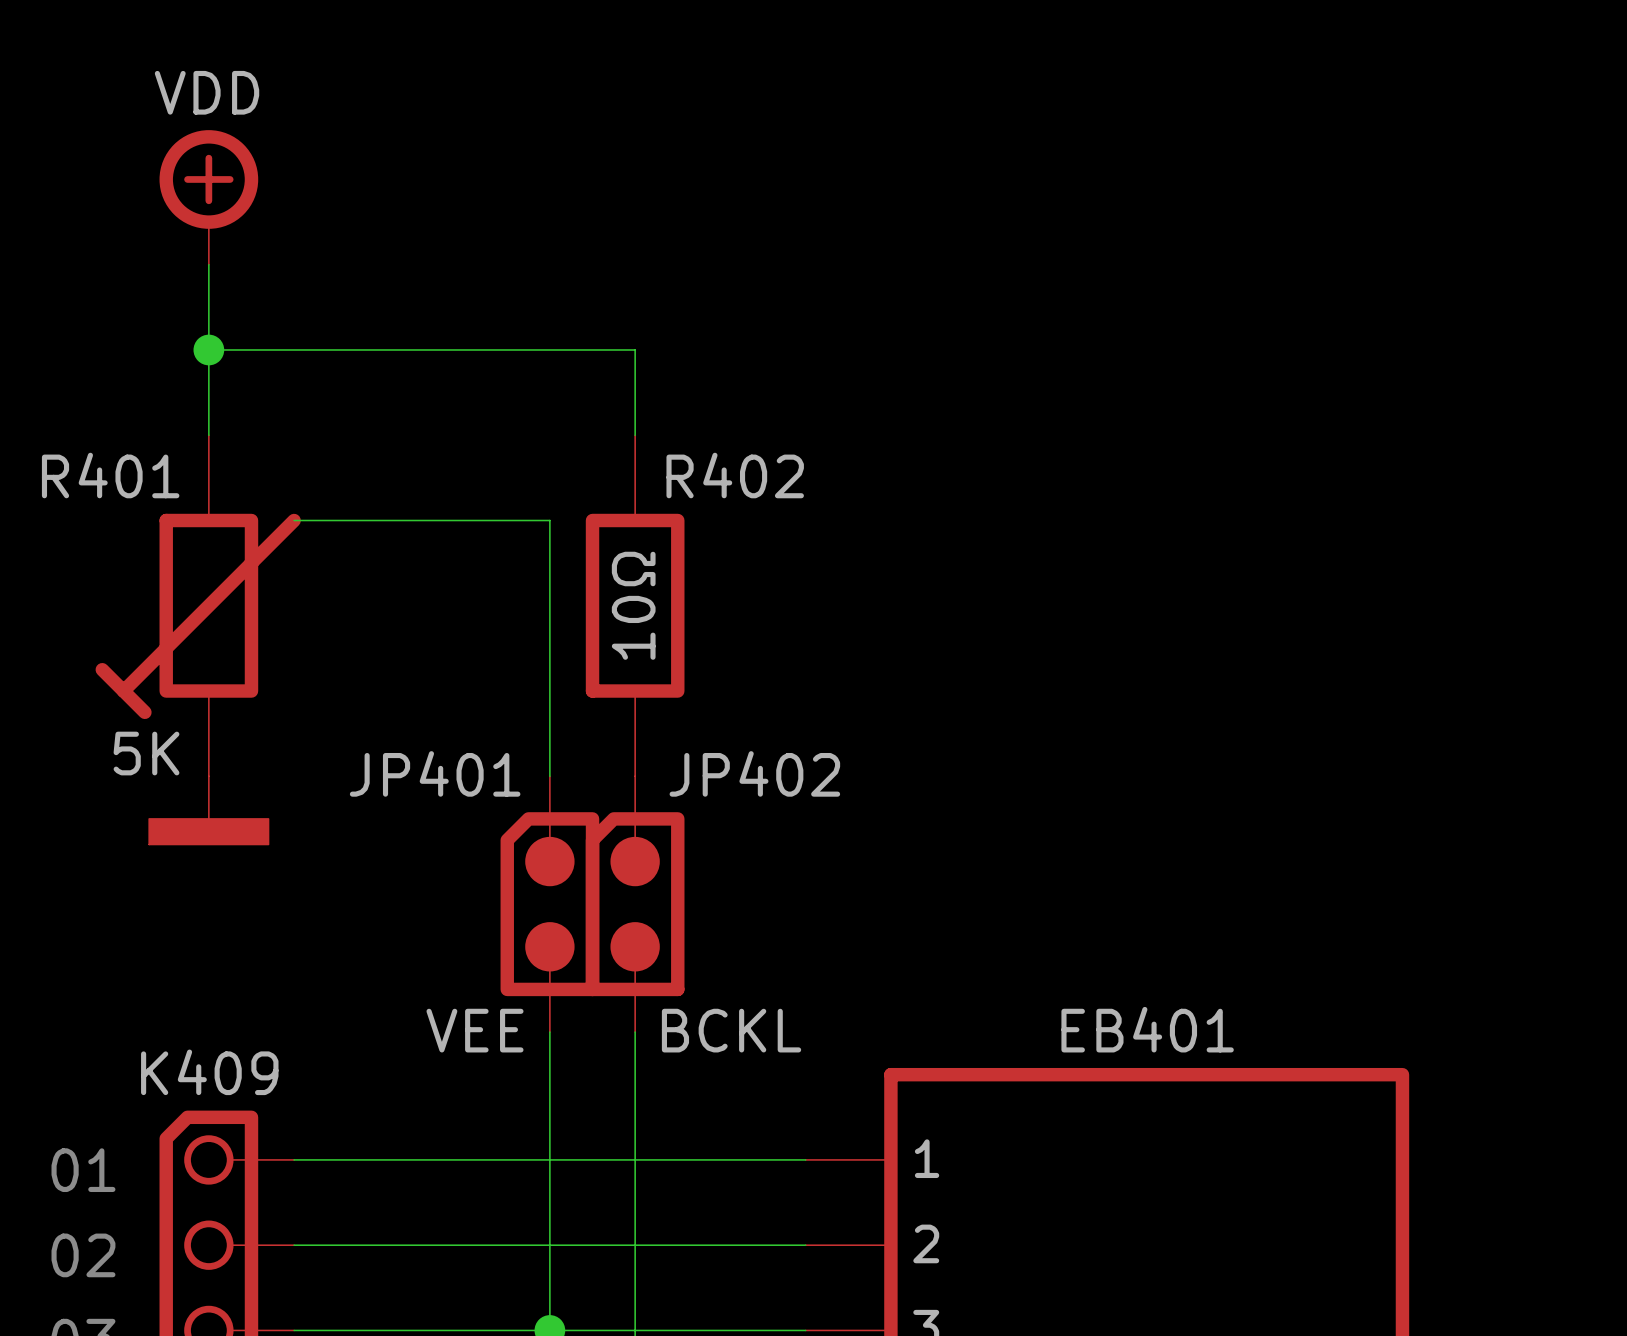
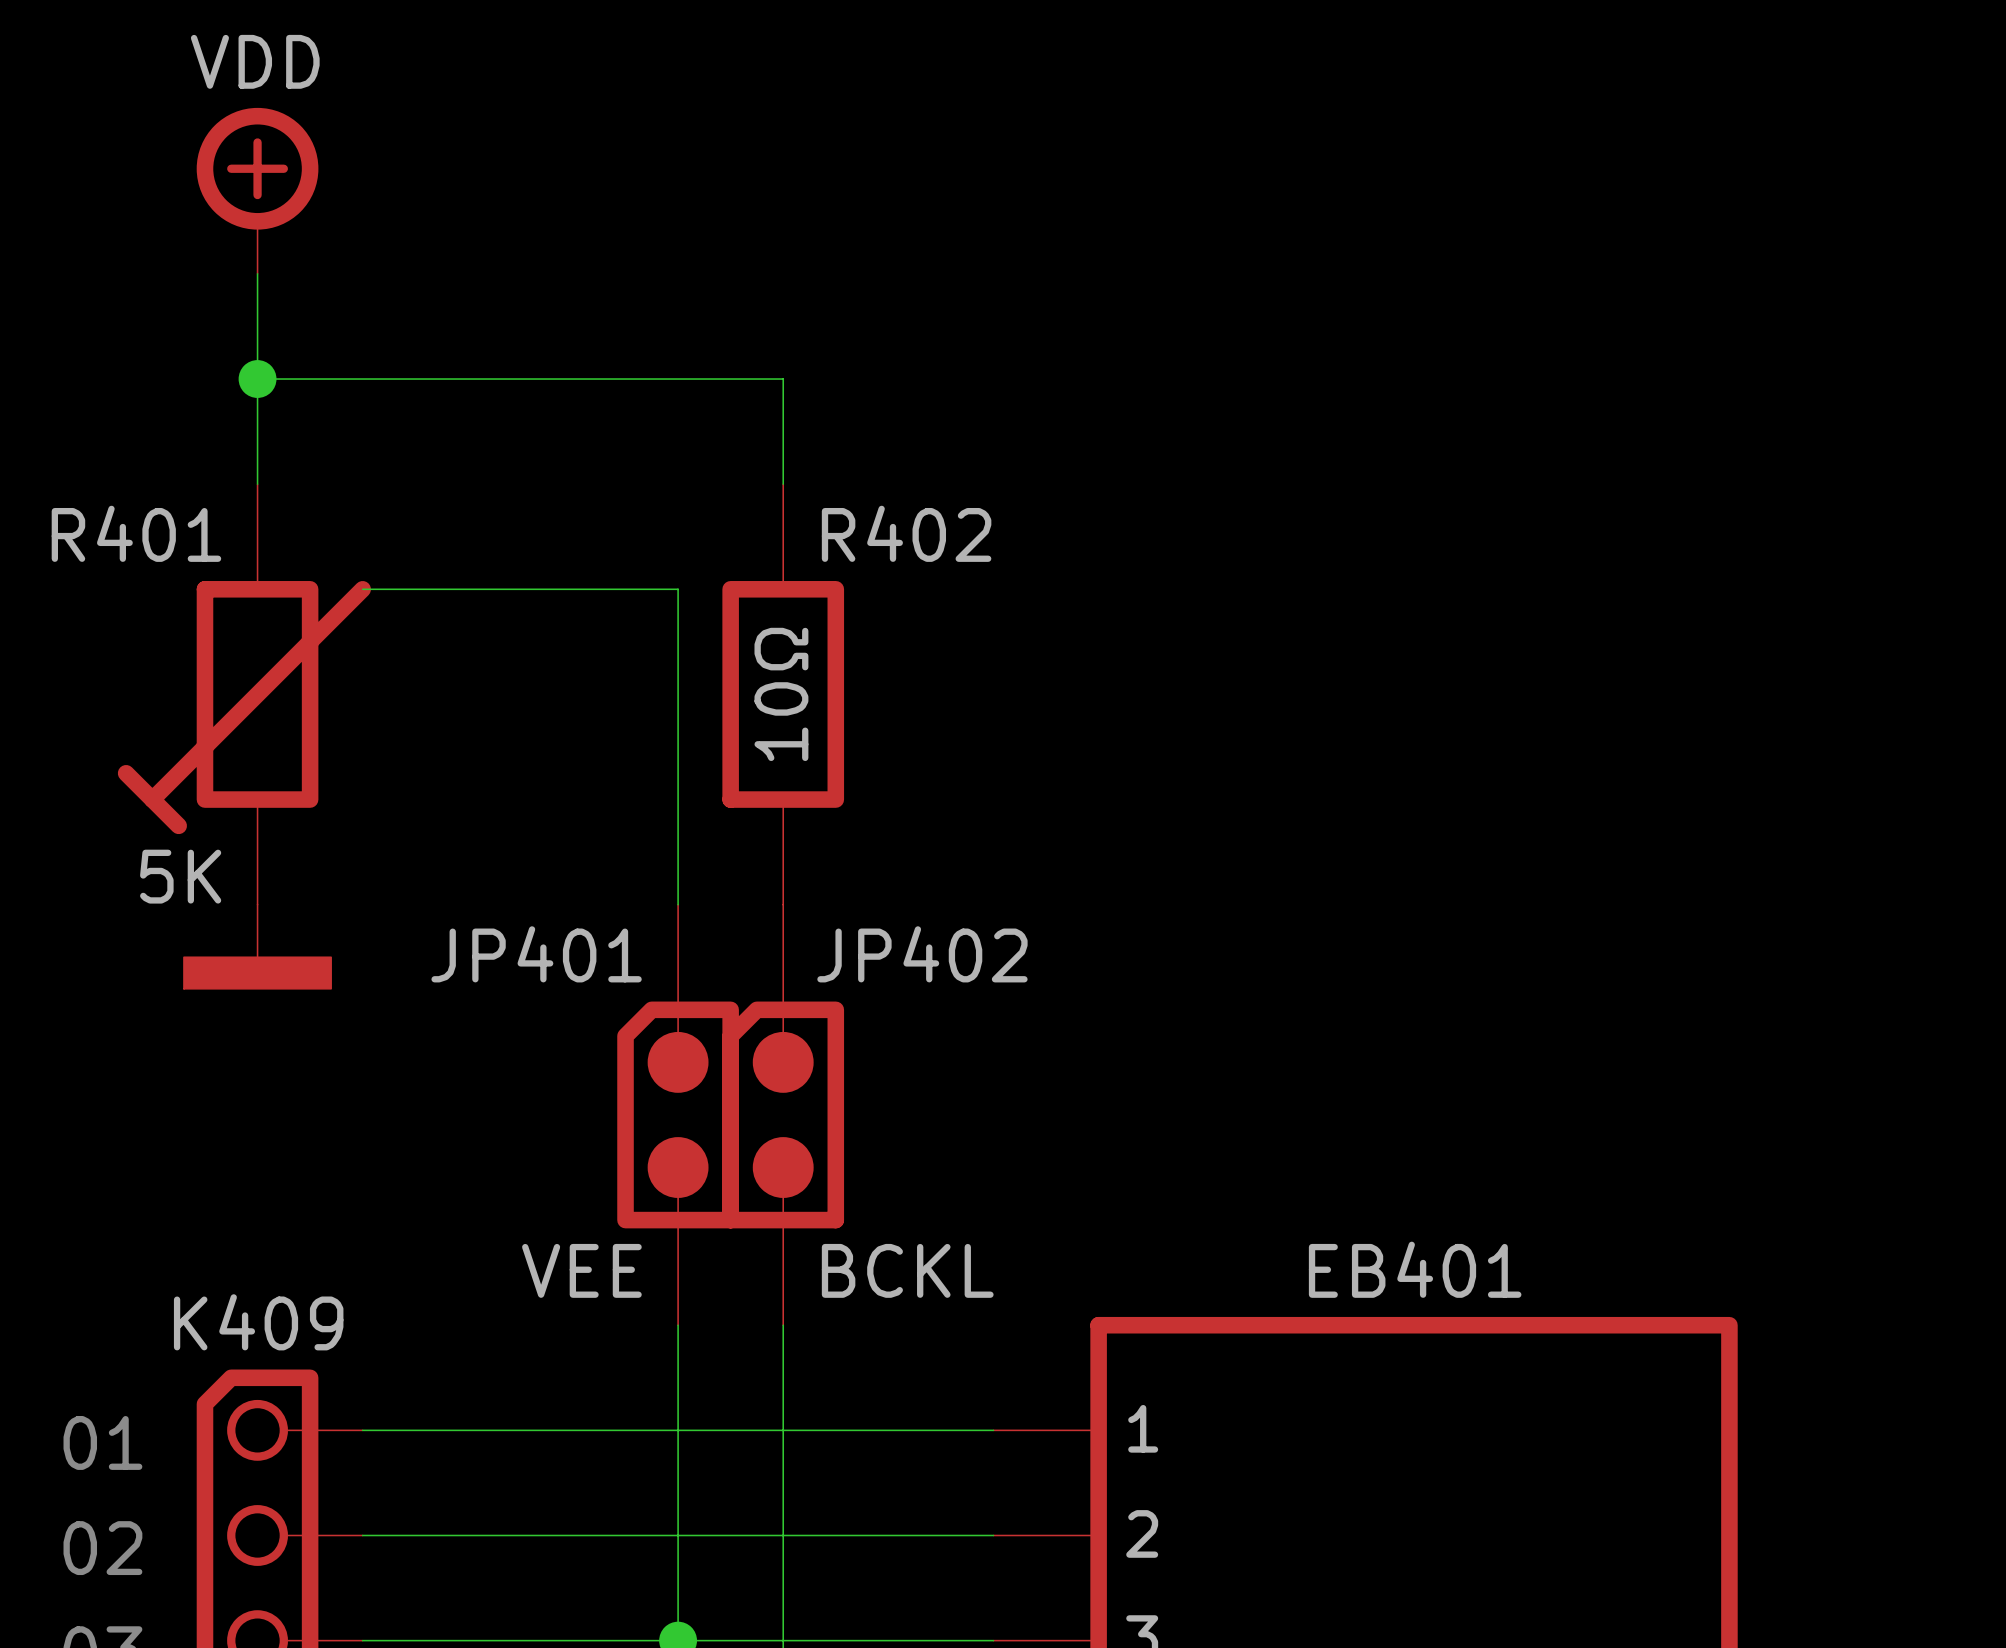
power symbol position: (208, 197) -> (257, 190)
wire: (208, 349) (635, 349) -> (257, 379) (783, 379) (783, 431)
junction position: (208, 349) -> (257, 379)
wire: (294, 520) (549, 520) -> (362, 589) (678, 589) (678, 641)
R401 position: (198, 605) -> (244, 694)
R402 position: (635, 605) -> (783, 694)
JP401 symbol: [500, 776, 600, 1033] -> [617, 904, 739, 1326]
JP402 symbol: [585, 776, 685, 1033] -> [722, 904, 845, 1326]
power symbol position: (208, 810) -> (257, 946)

